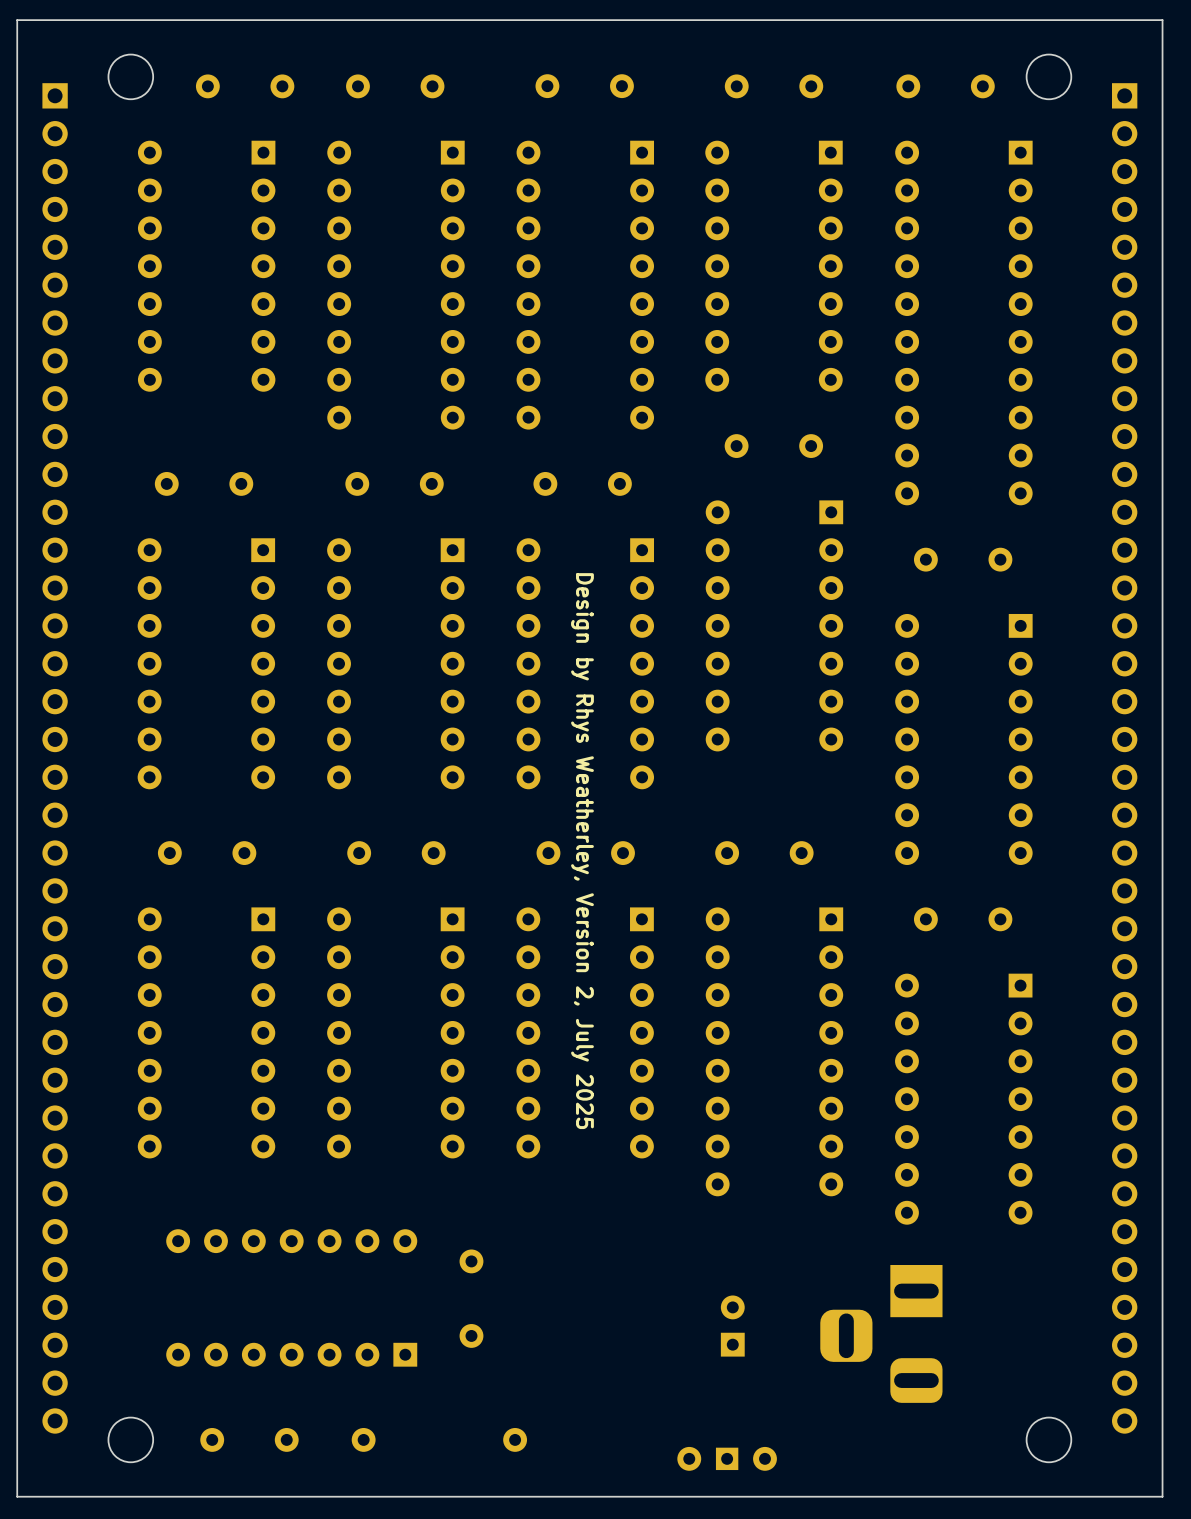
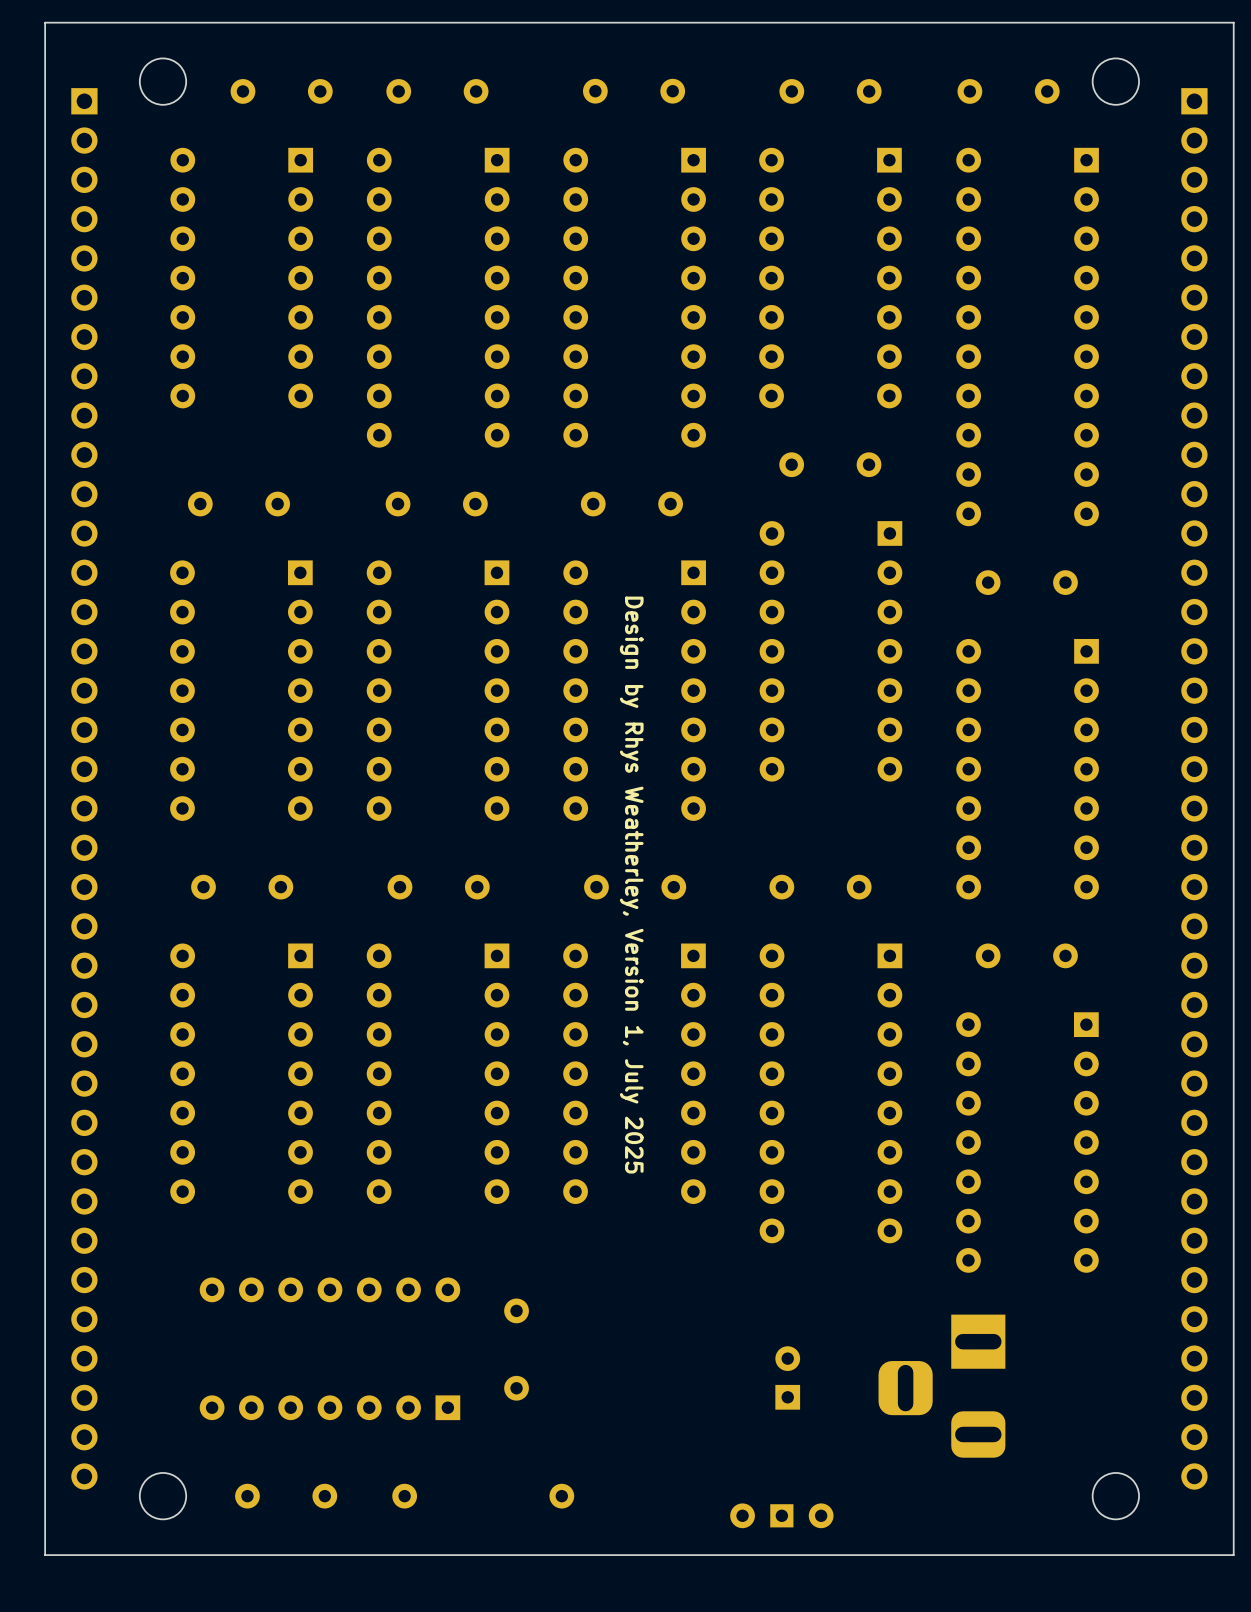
text: Design by Rhys Weatherley, Version 2, July 2025 (582, 851) -> Design by Rhys Weatherley, Version 1, July 2025 (631, 885)

